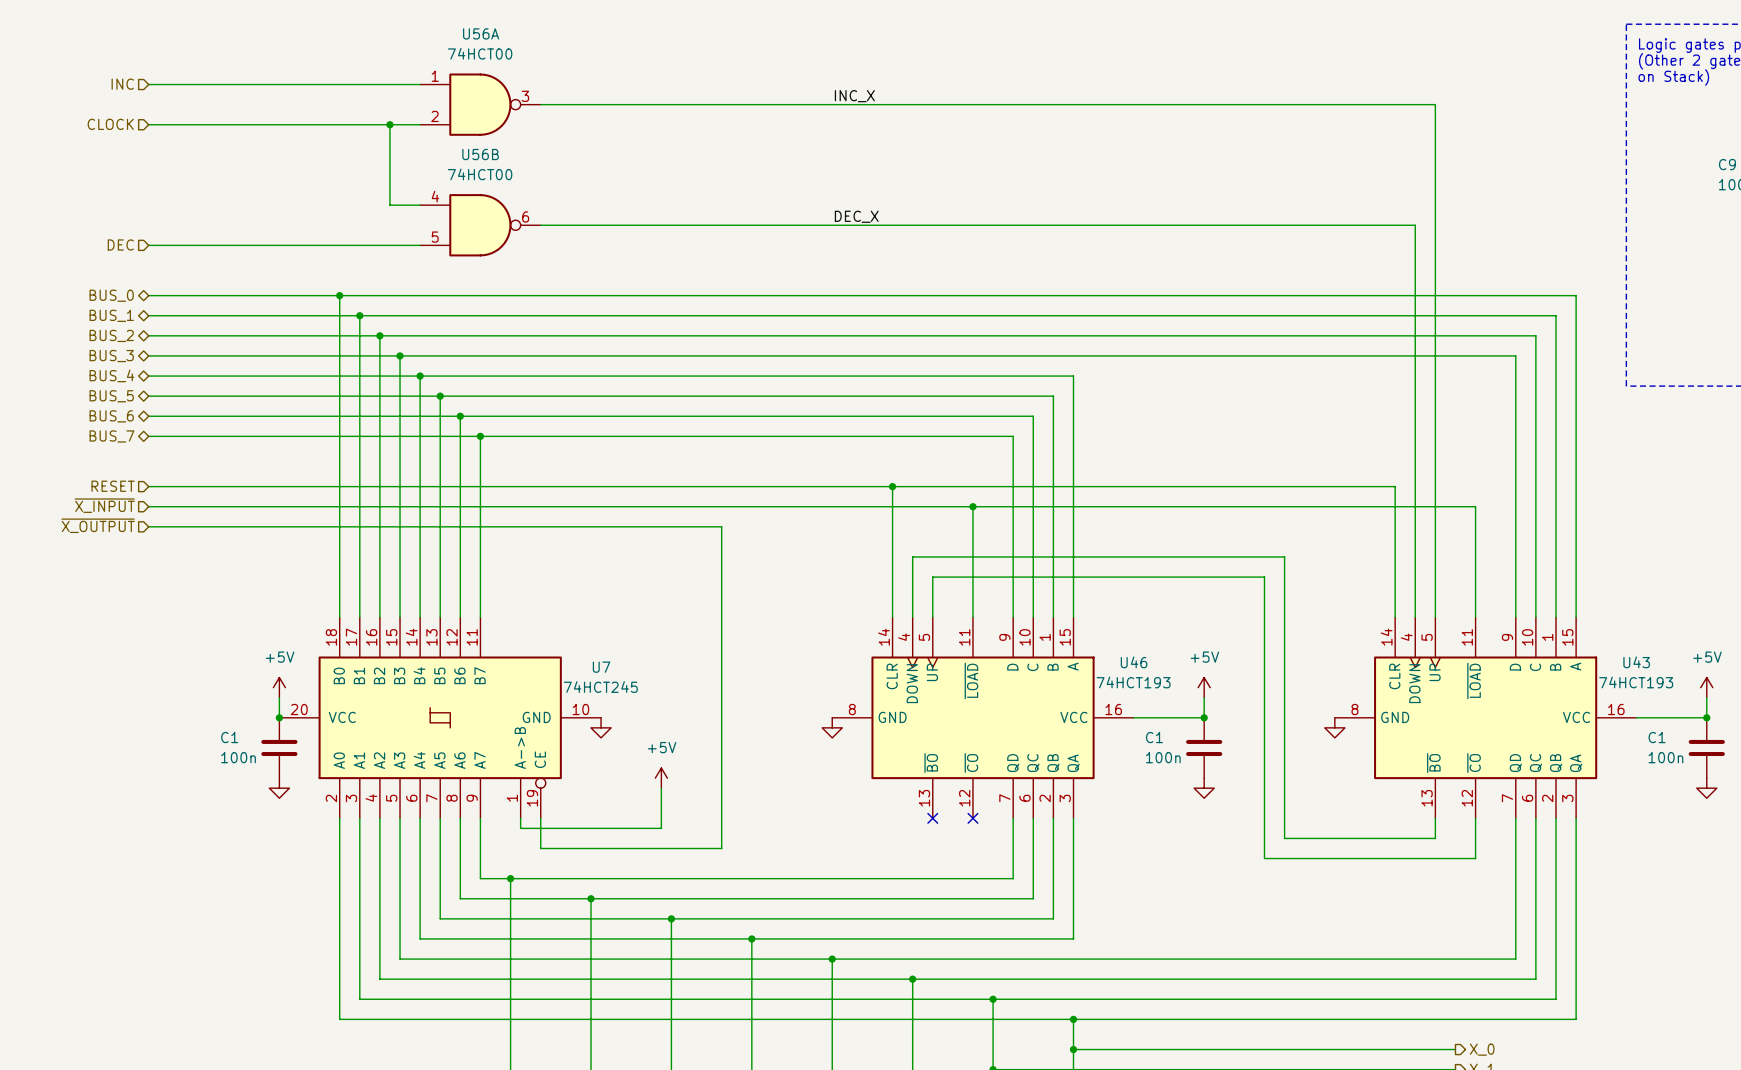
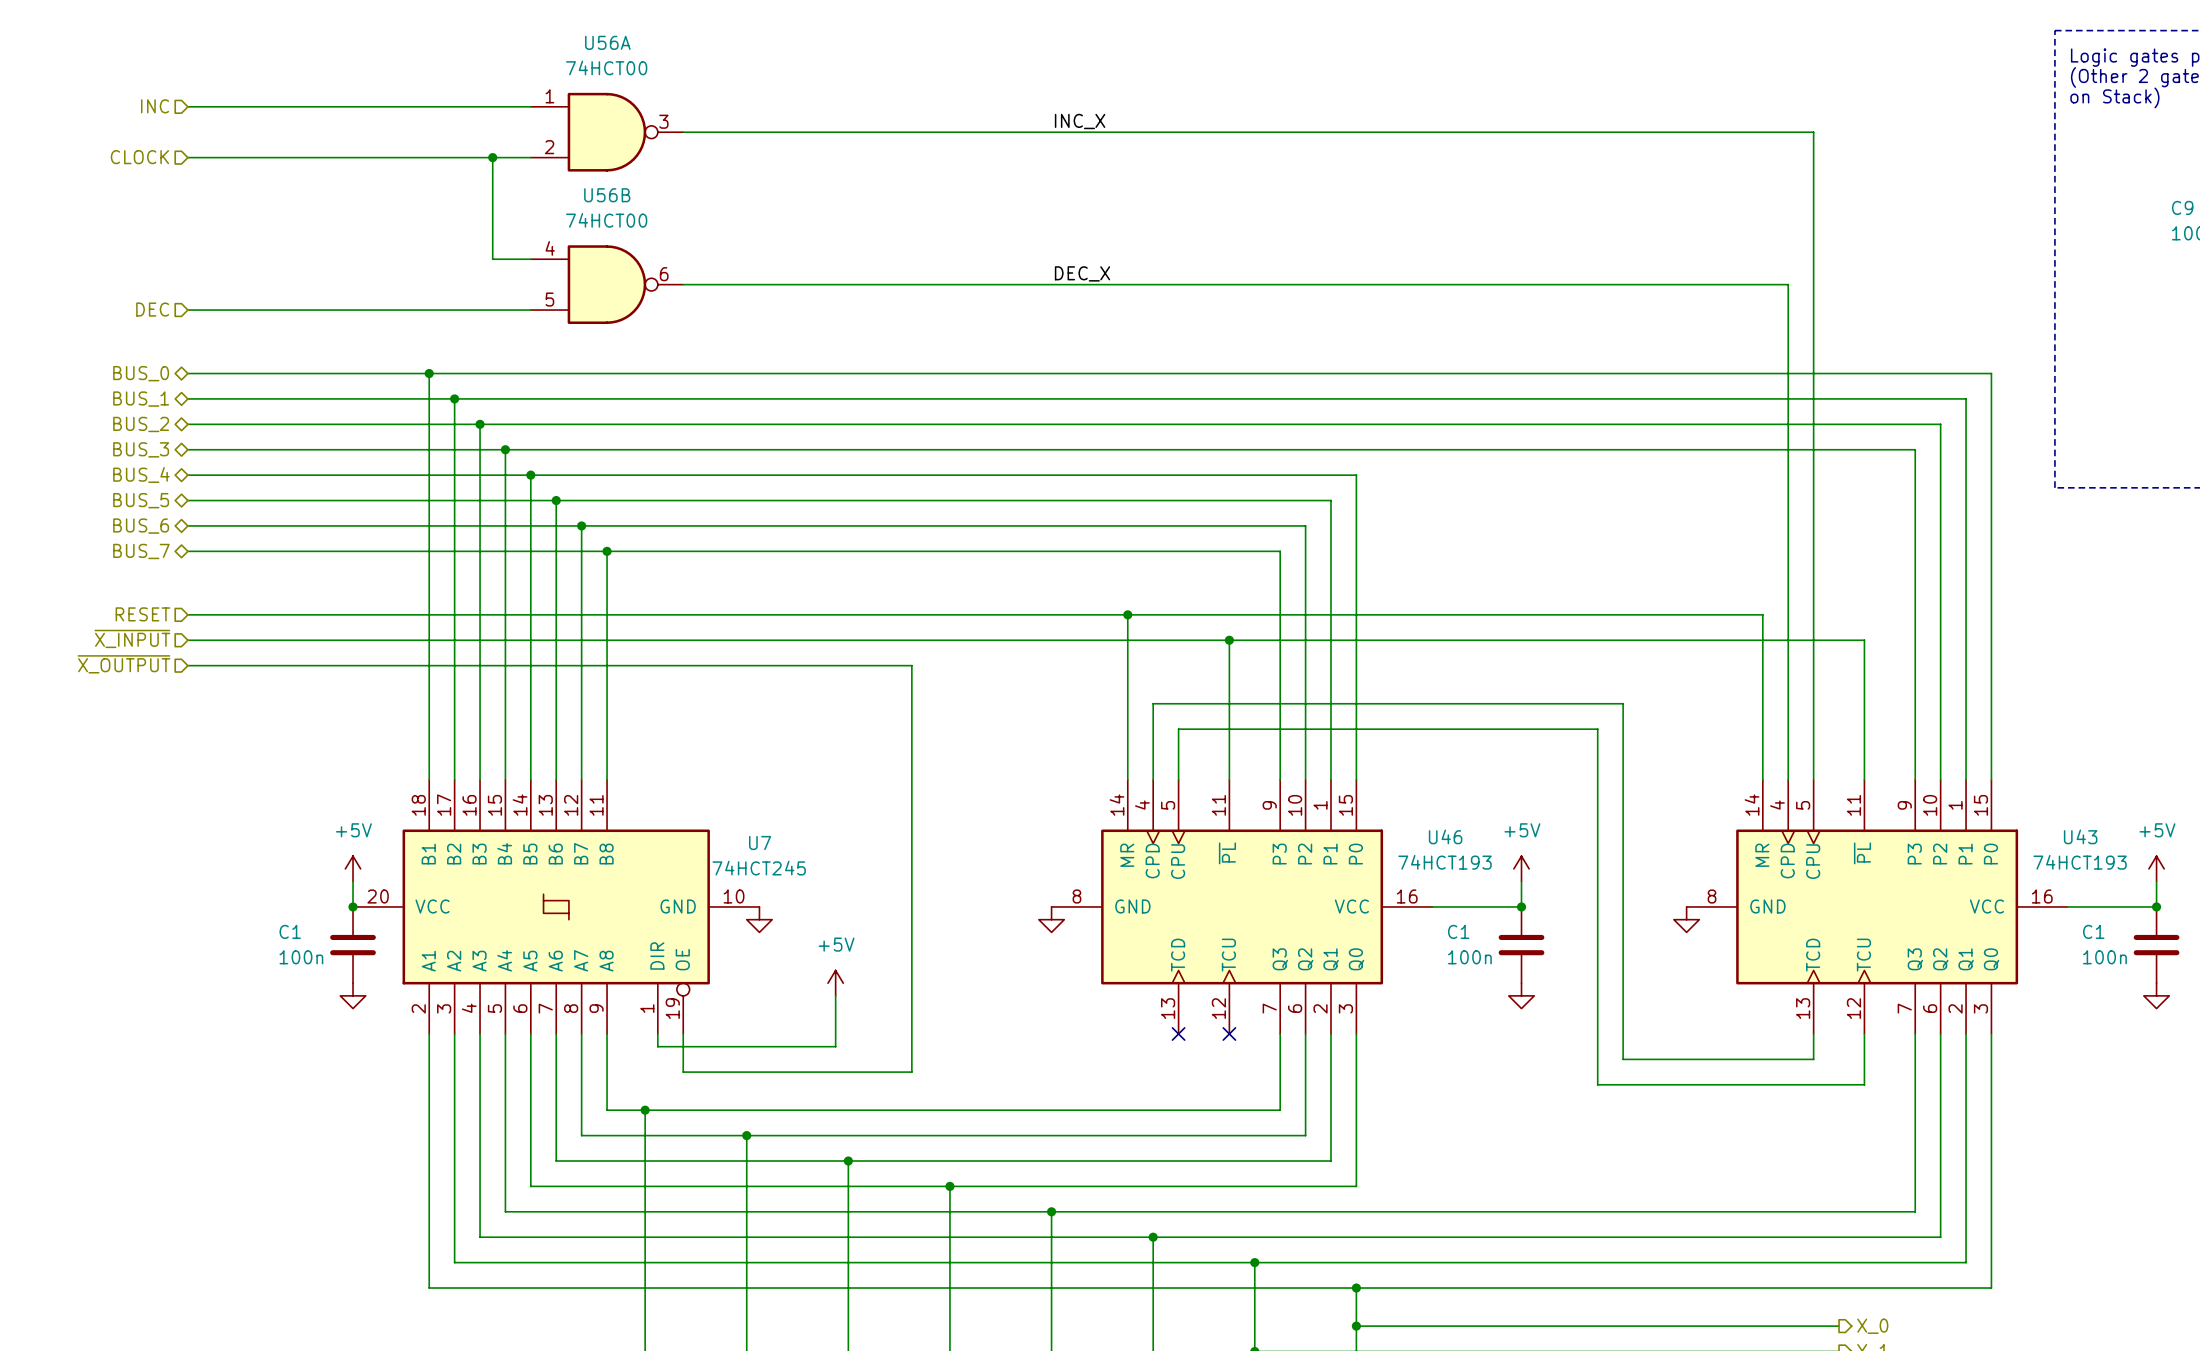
U7 symbol: [279, 617, 602, 819] -> [353, 779, 760, 1034]
U46 symbol: [832, 617, 1134, 819] -> [1051, 779, 1433, 1034]
U43 symbol: [1334, 617, 1637, 819] -> [1686, 779, 2068, 1034]

